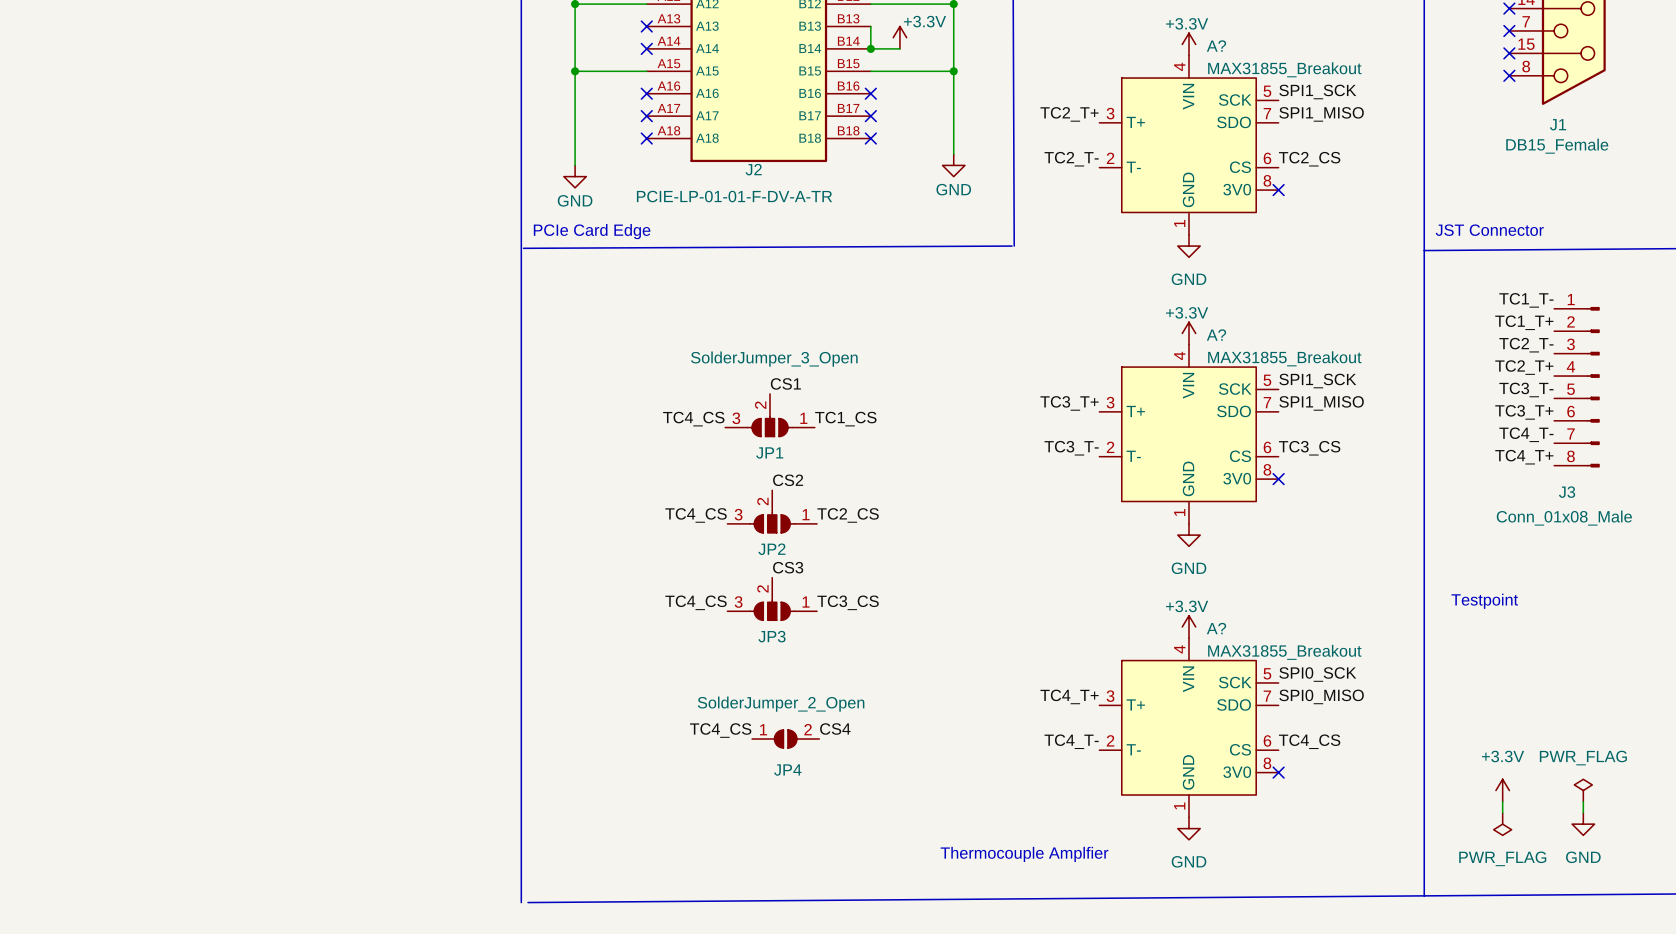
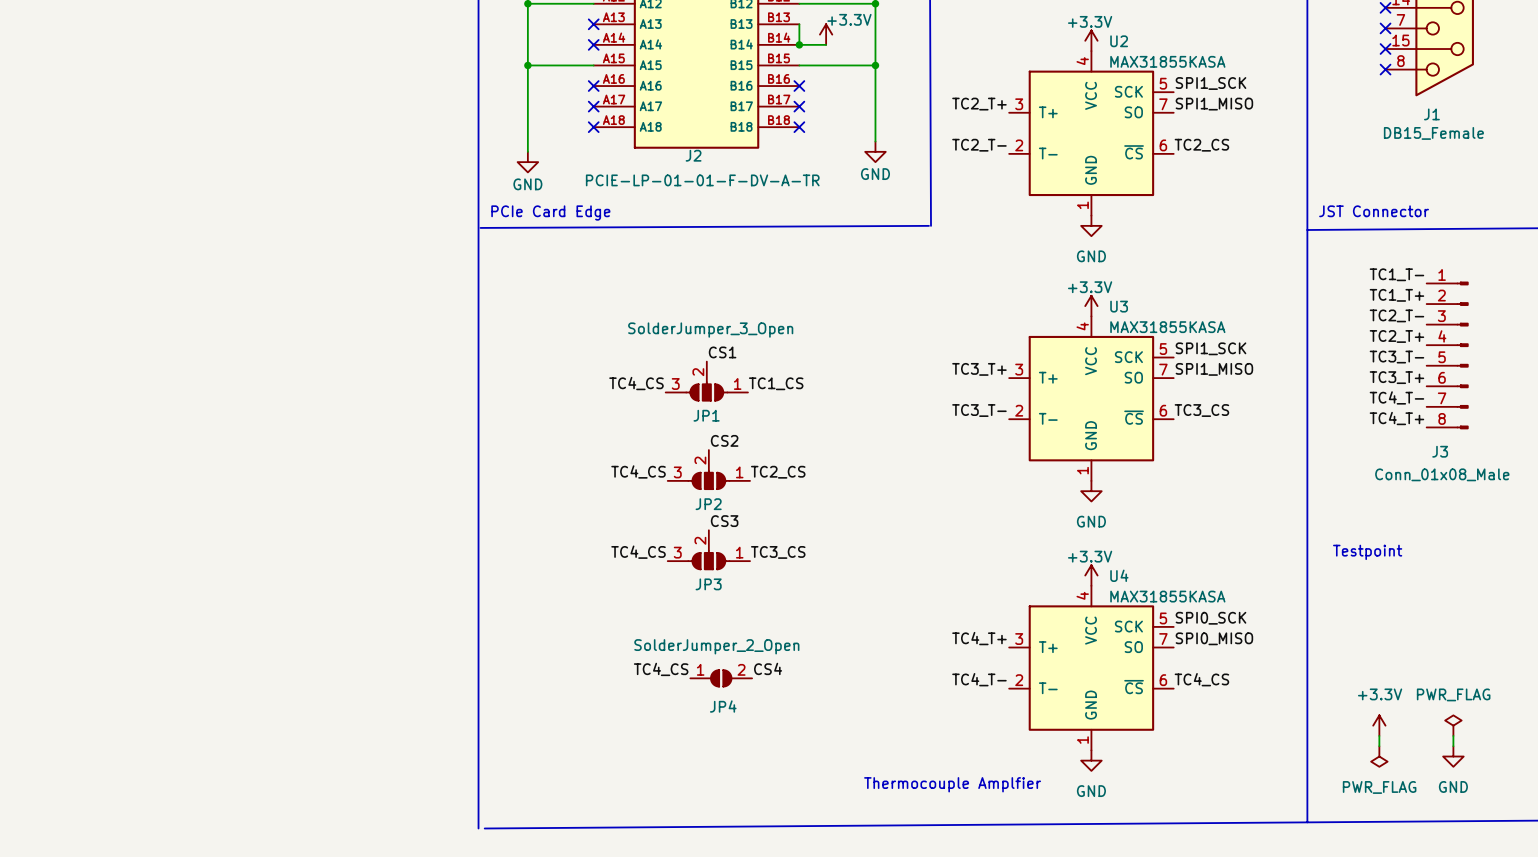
A?: MAX31855_Breakout (1188, 145) -> none
U2: none -> MAX31855KASA (1091, 133)
no-connect mark: (1278, 190) -> none
A?: MAX31855_Breakout (1188, 434) -> none
U3: none -> MAX31855KASA (1091, 398)
no-connect mark: (1278, 479) -> none
A?: MAX31855_Breakout (1188, 727) -> none
U4: none -> MAX31855KASA (1091, 668)
no-connect mark: (1278, 772) -> none

